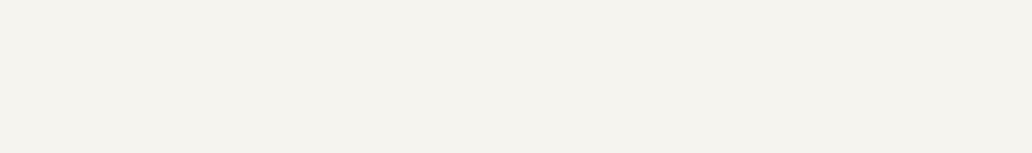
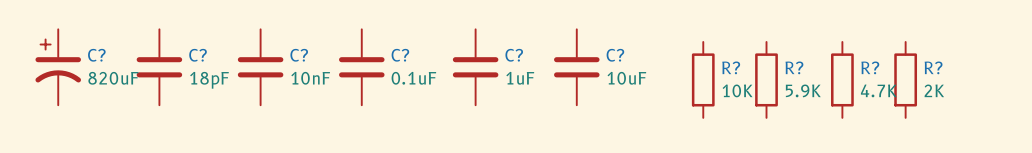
C?: none -> 820uF (58, 67)
C?: none -> 18pF (159, 67)
C?: none -> 10nF (260, 67)
C?: none -> 0.1uF (361, 67)
C?: none -> 1uF (475, 67)
C?: none -> 10uF (576, 67)
R?: none -> 10K (703, 79)
R?: none -> 5.9K (766, 79)
R?: none -> 4.7K (842, 79)
R?: none -> 2K (905, 79)

